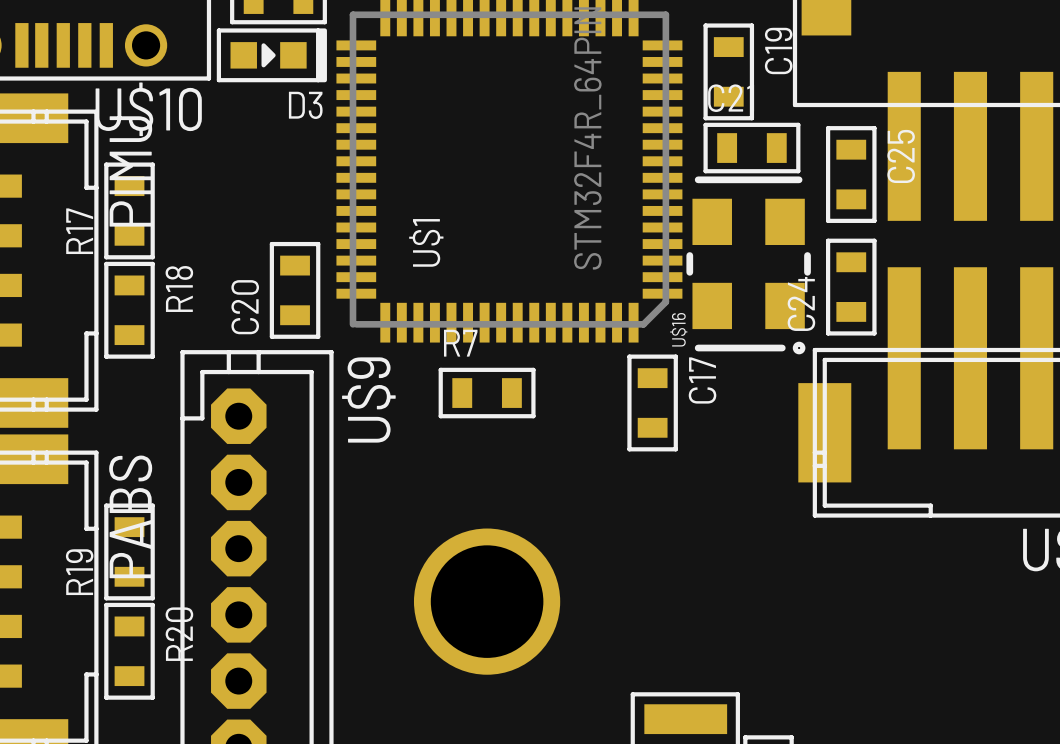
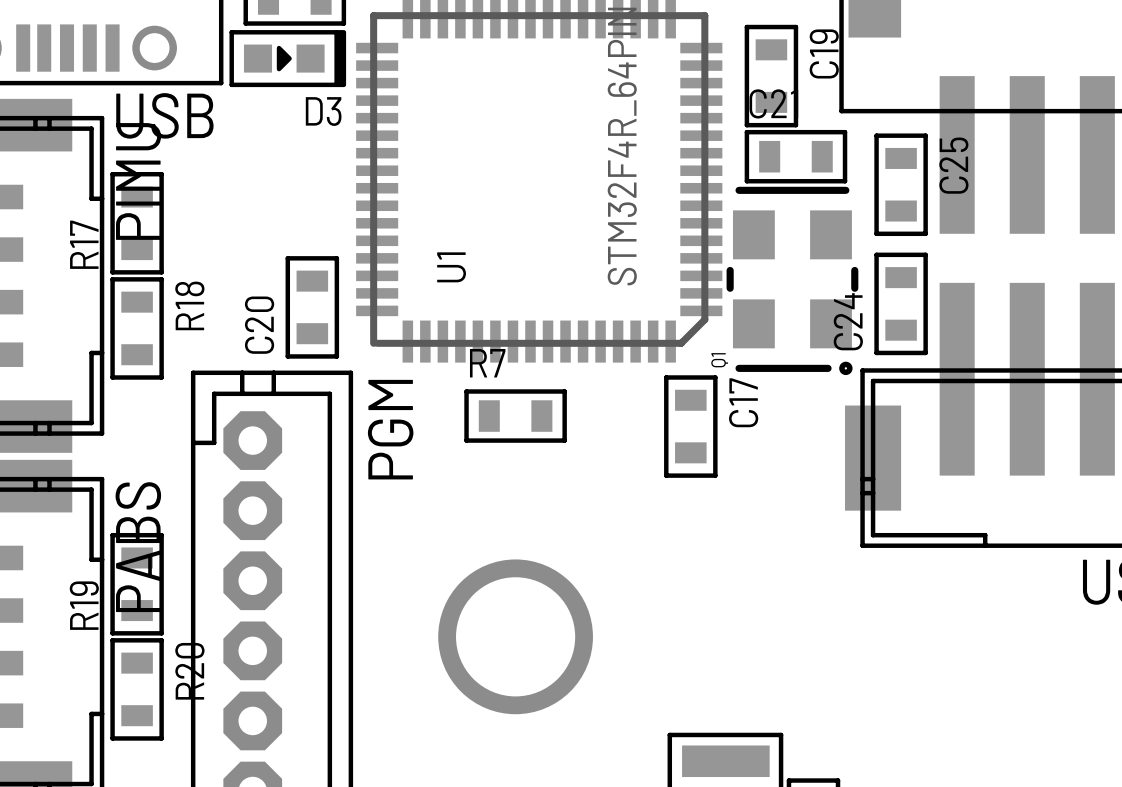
U$10 name: U$10 (148, 109) -> USB (164, 115)
U$1 name: U$1 (426, 242) -> U1 (451, 267)
U$16 name: U$16 (678, 329) -> Q1 (719, 360)
U$9 name: U$9 (368, 399) -> PGM (390, 429)

